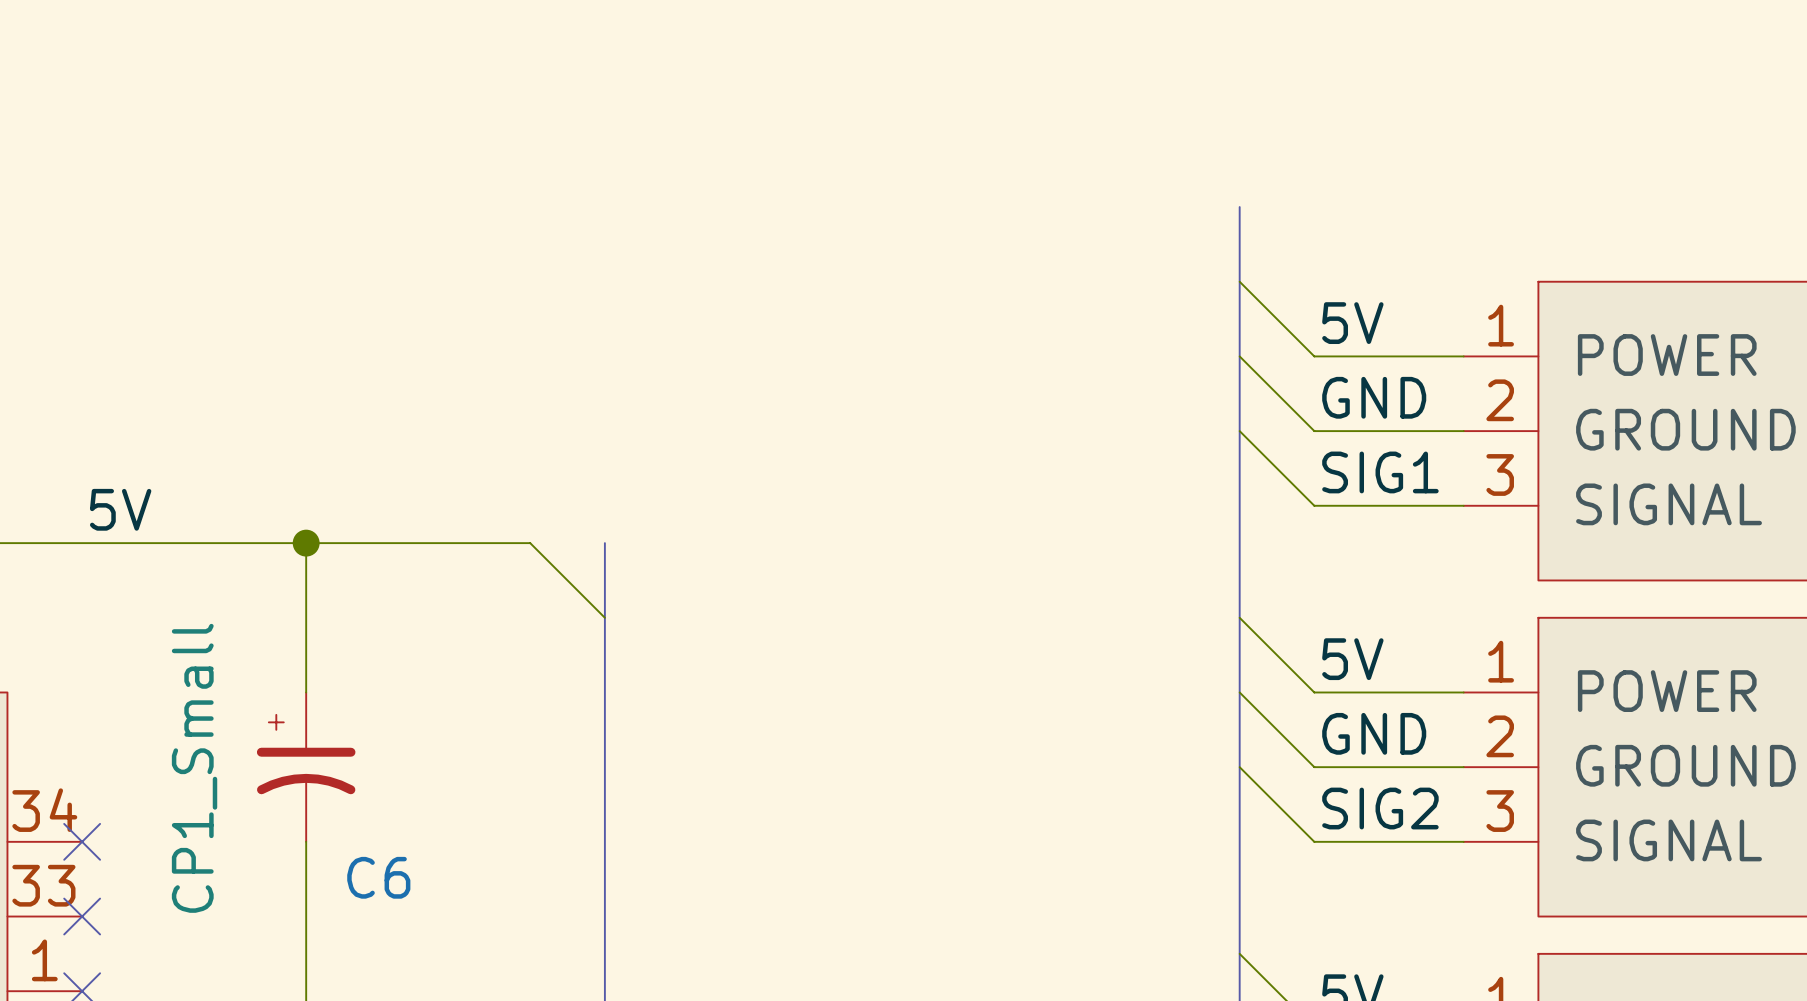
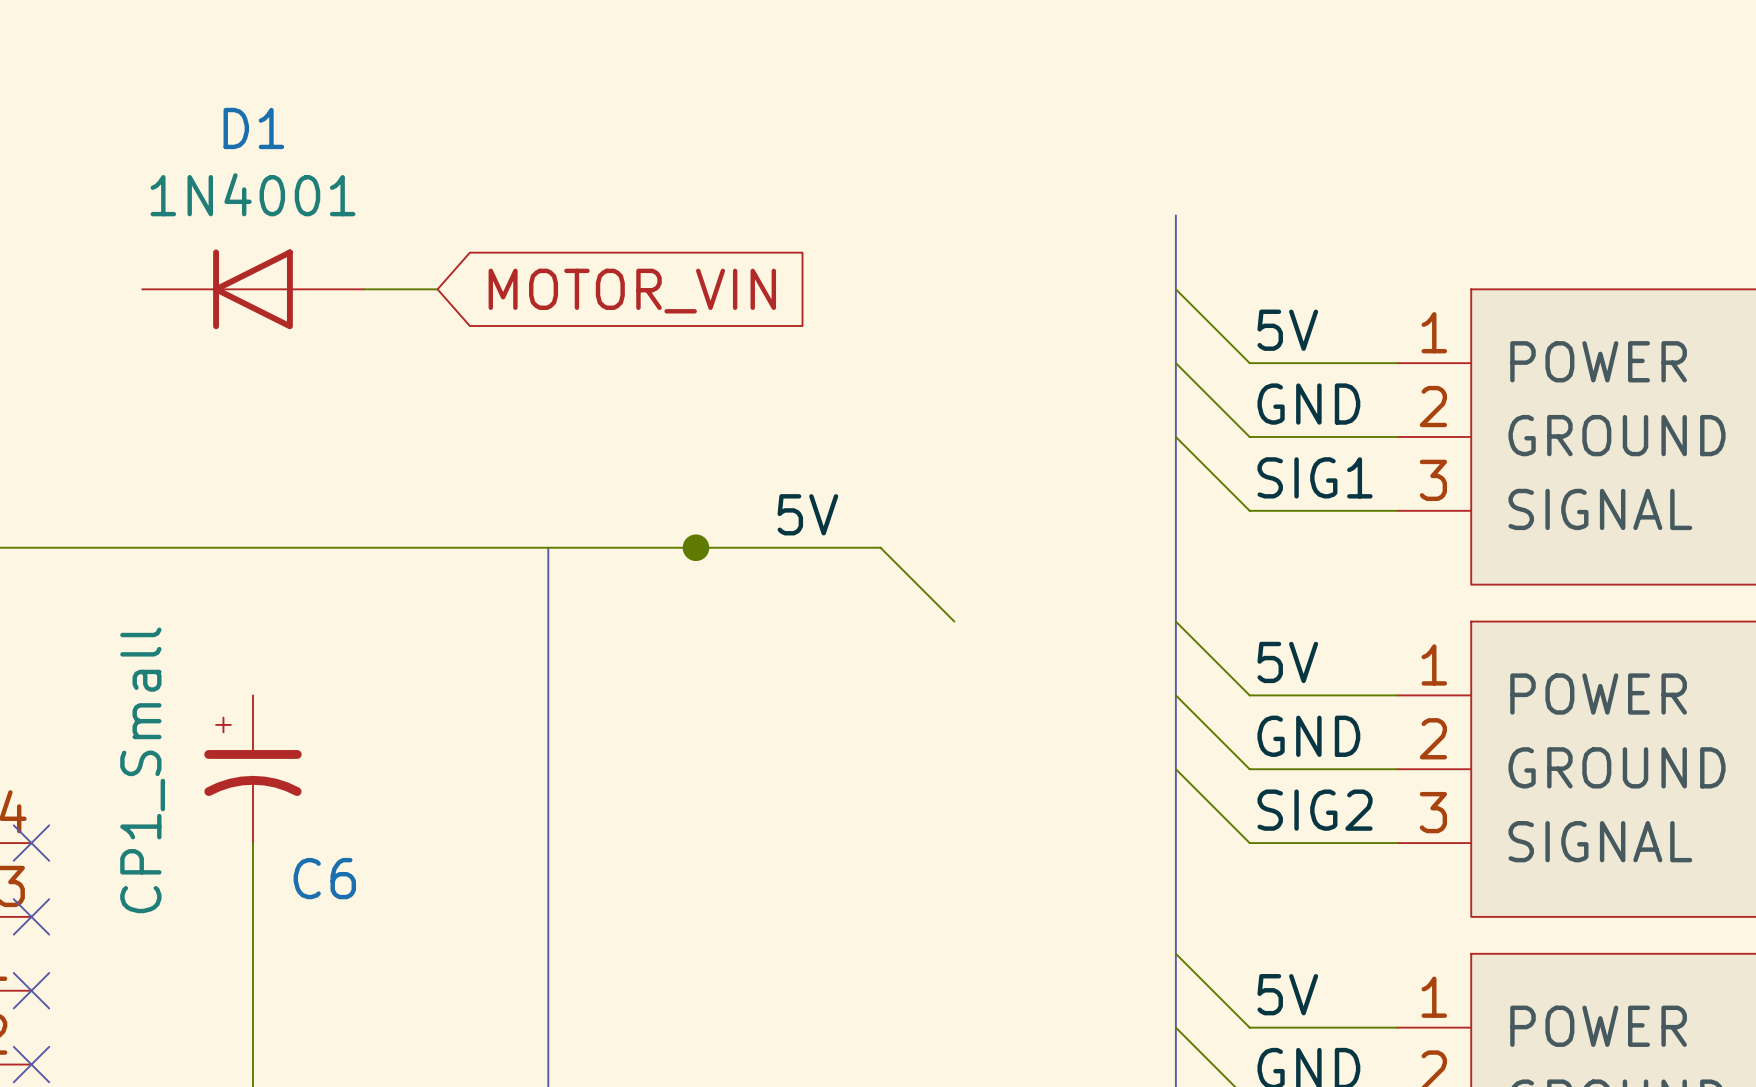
D1: none -> 1N4001 (252, 289)
wire: none -> (363, 289) (437, 289)
global label: none -> MOTOR_VIN (632, 291)
label: 5V (120, 509) -> none
label: none -> 5V (807, 514)
wire: (306, 543) (306, 692) -> none
junction: (306, 543) -> none
wire: (530, 543) (604, 617) -> (474, 547) (880, 547) (954, 621)
junction: none -> (695, 547)

